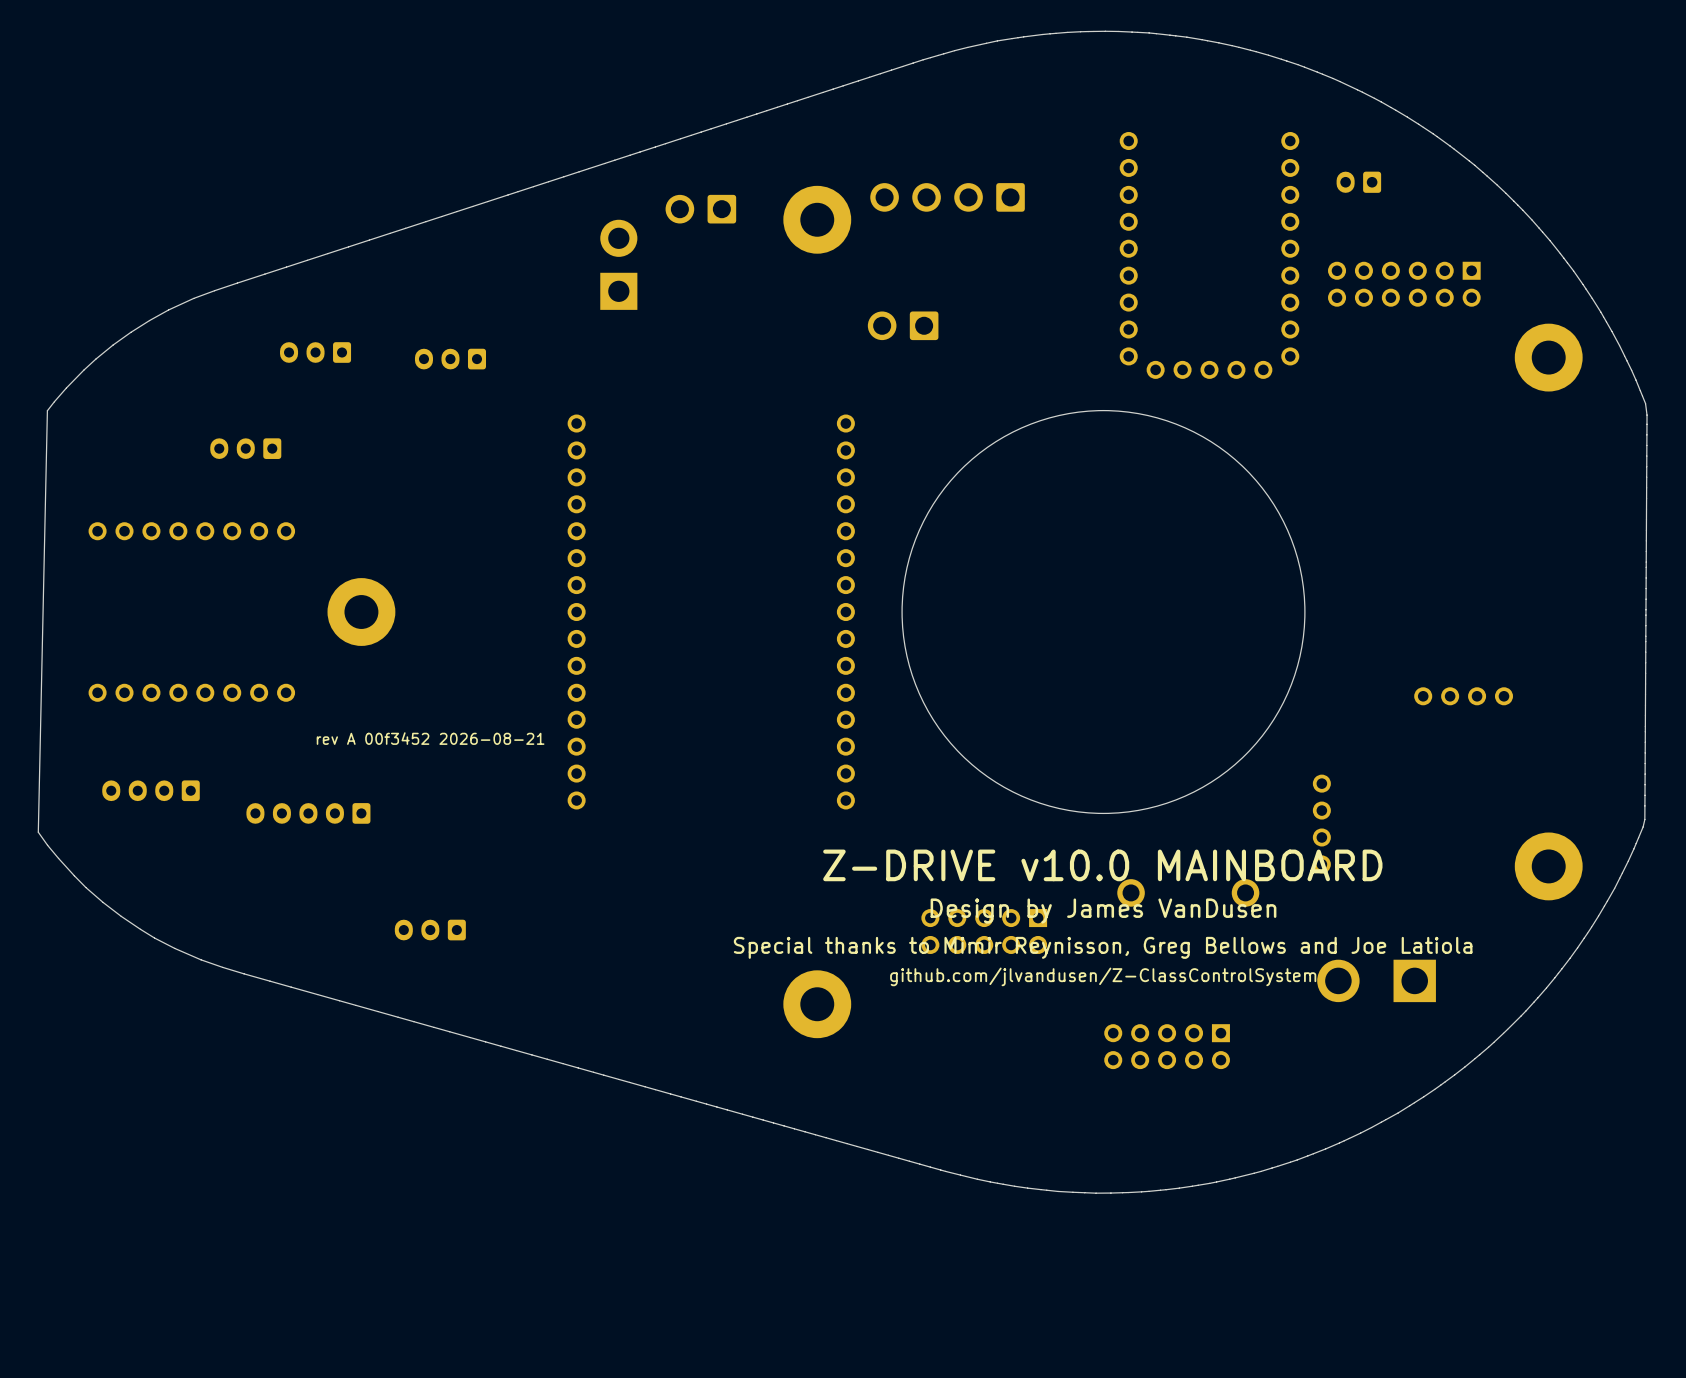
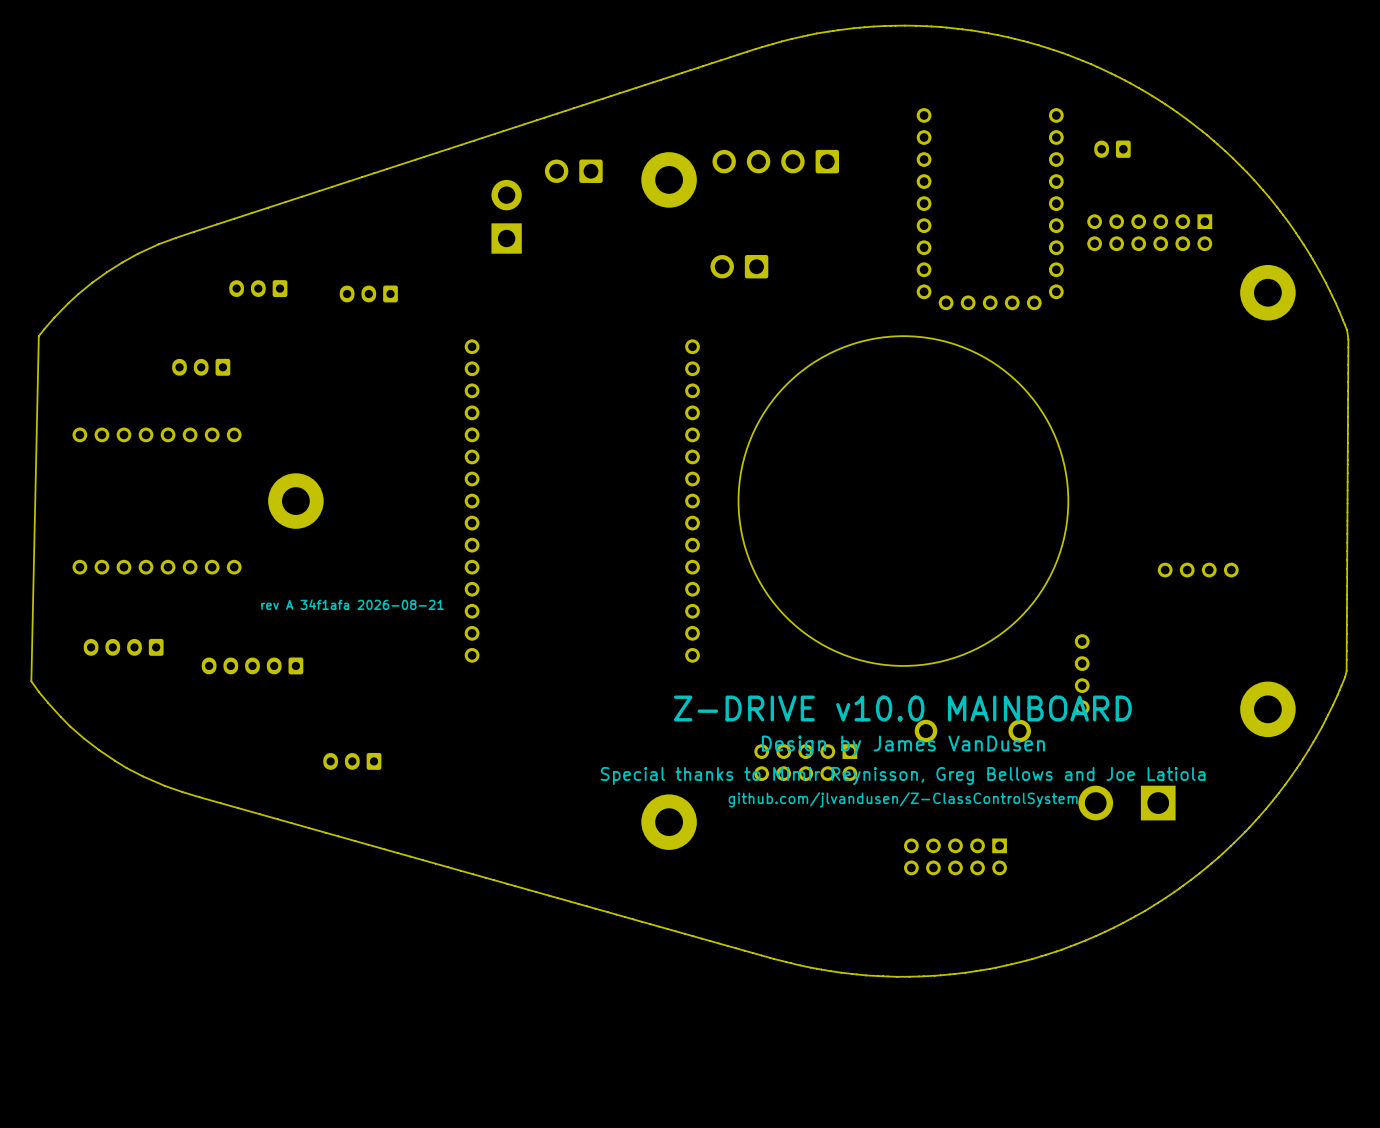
text: rev A 00f3452 2026-08-21 (430, 738) -> rev A 34f1afa 2026-08-21 (352, 604)

